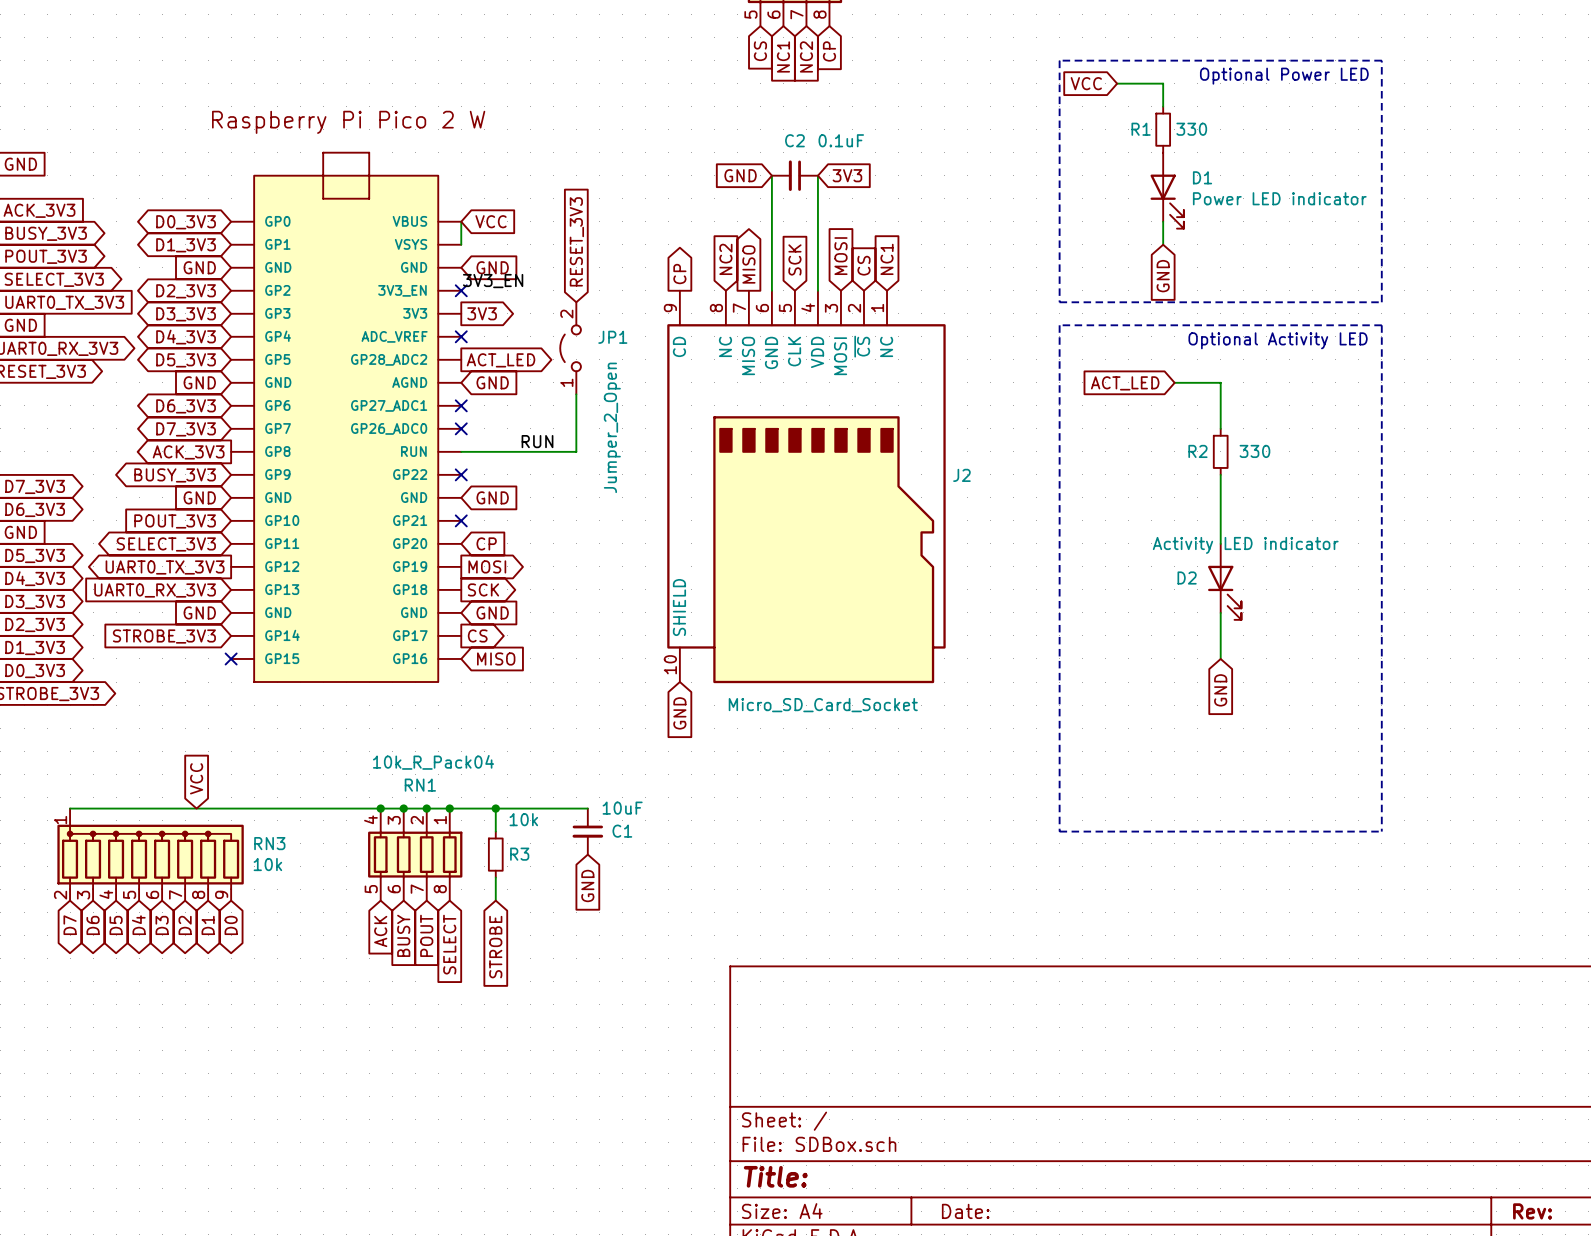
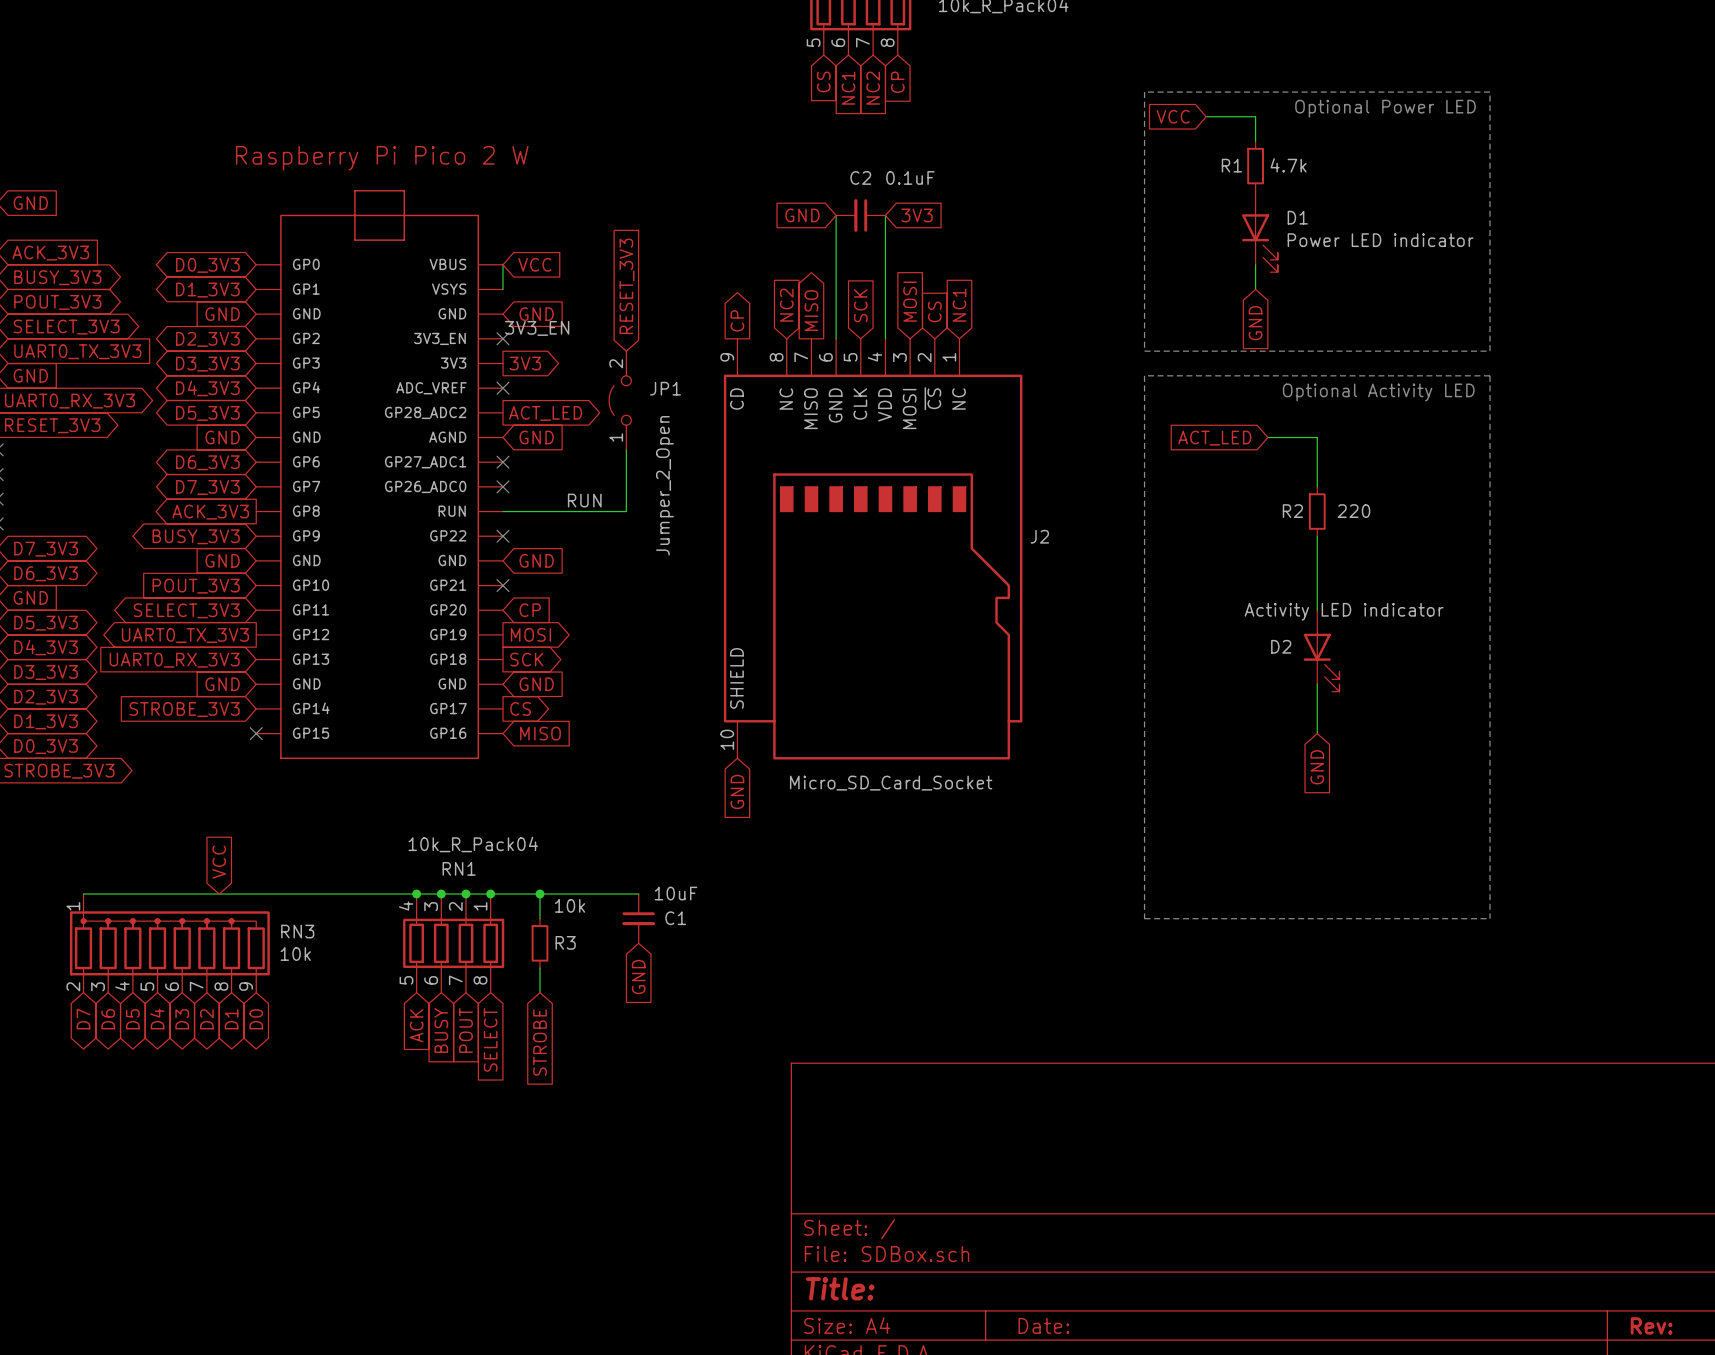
R1 value: 330 (1191, 129) -> 4.7k (1288, 165)
R2 value: 330 (1254, 451) -> 220 (1353, 511)

